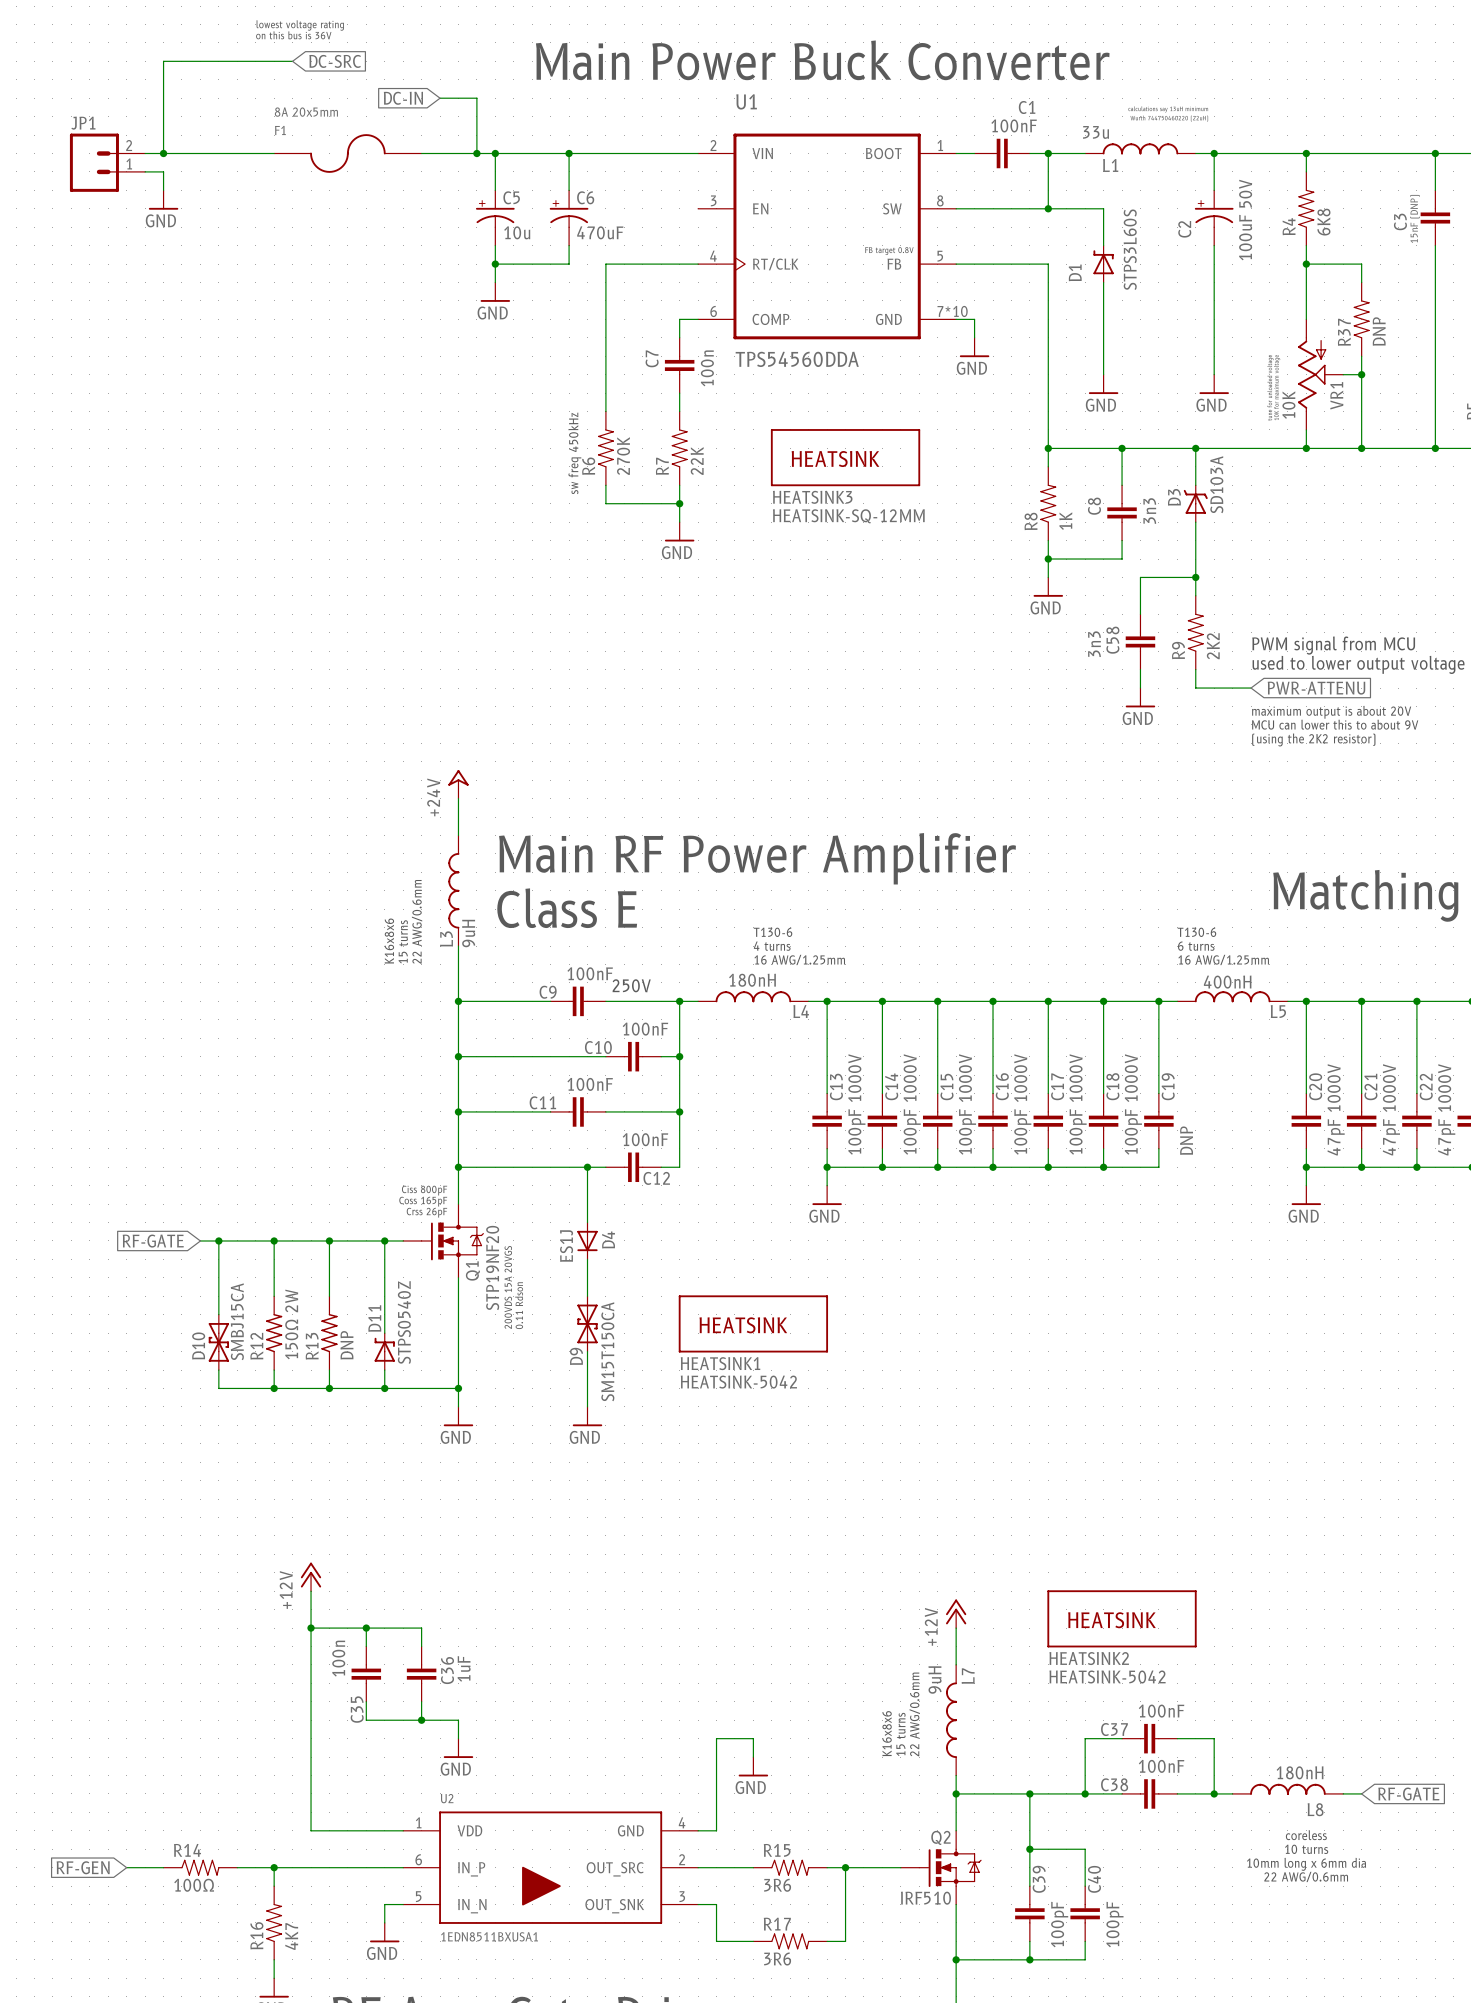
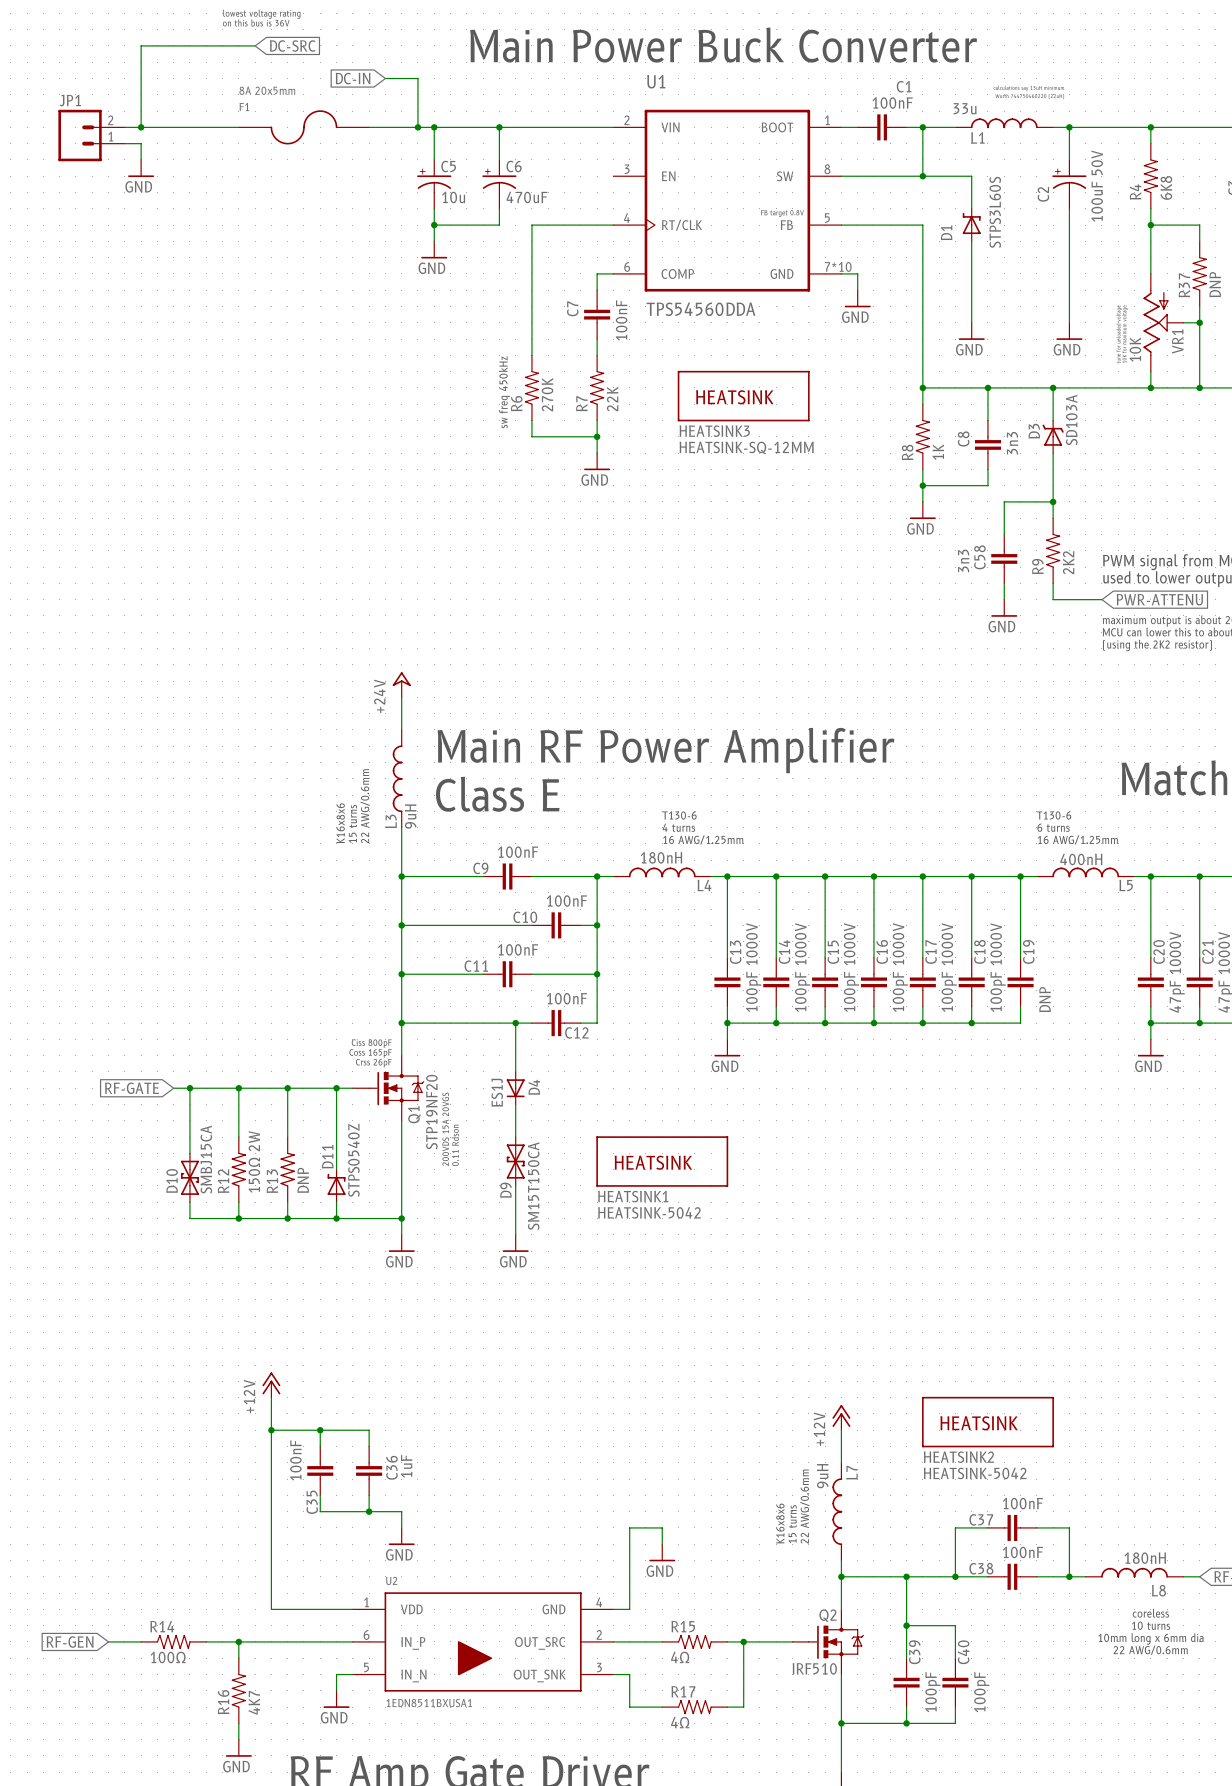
C7 value: 100n (707, 368) -> 100nF (621, 320)
text: 250V (631, 985) -> none
C35 value: 100n (338, 1658) -> 100nF (295, 1460)
R15 value: 3R6 (777, 1885) -> 4Ω (680, 1657)
R17 value: 3R6 (777, 1959) -> 4Ω (680, 1722)

